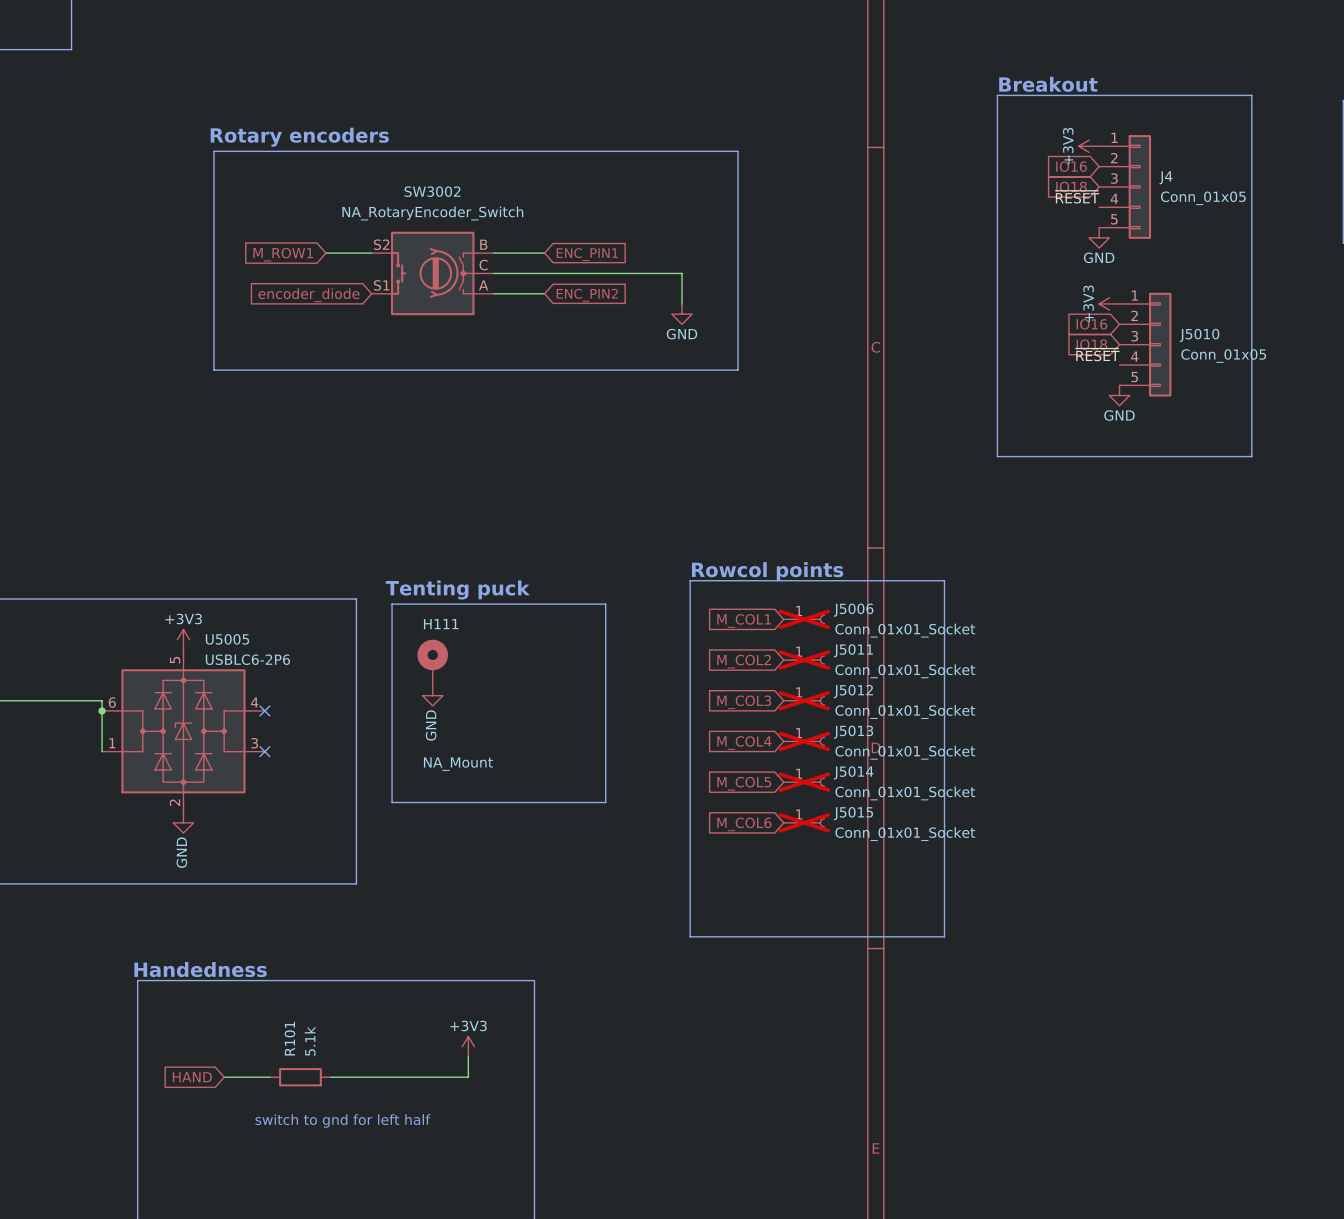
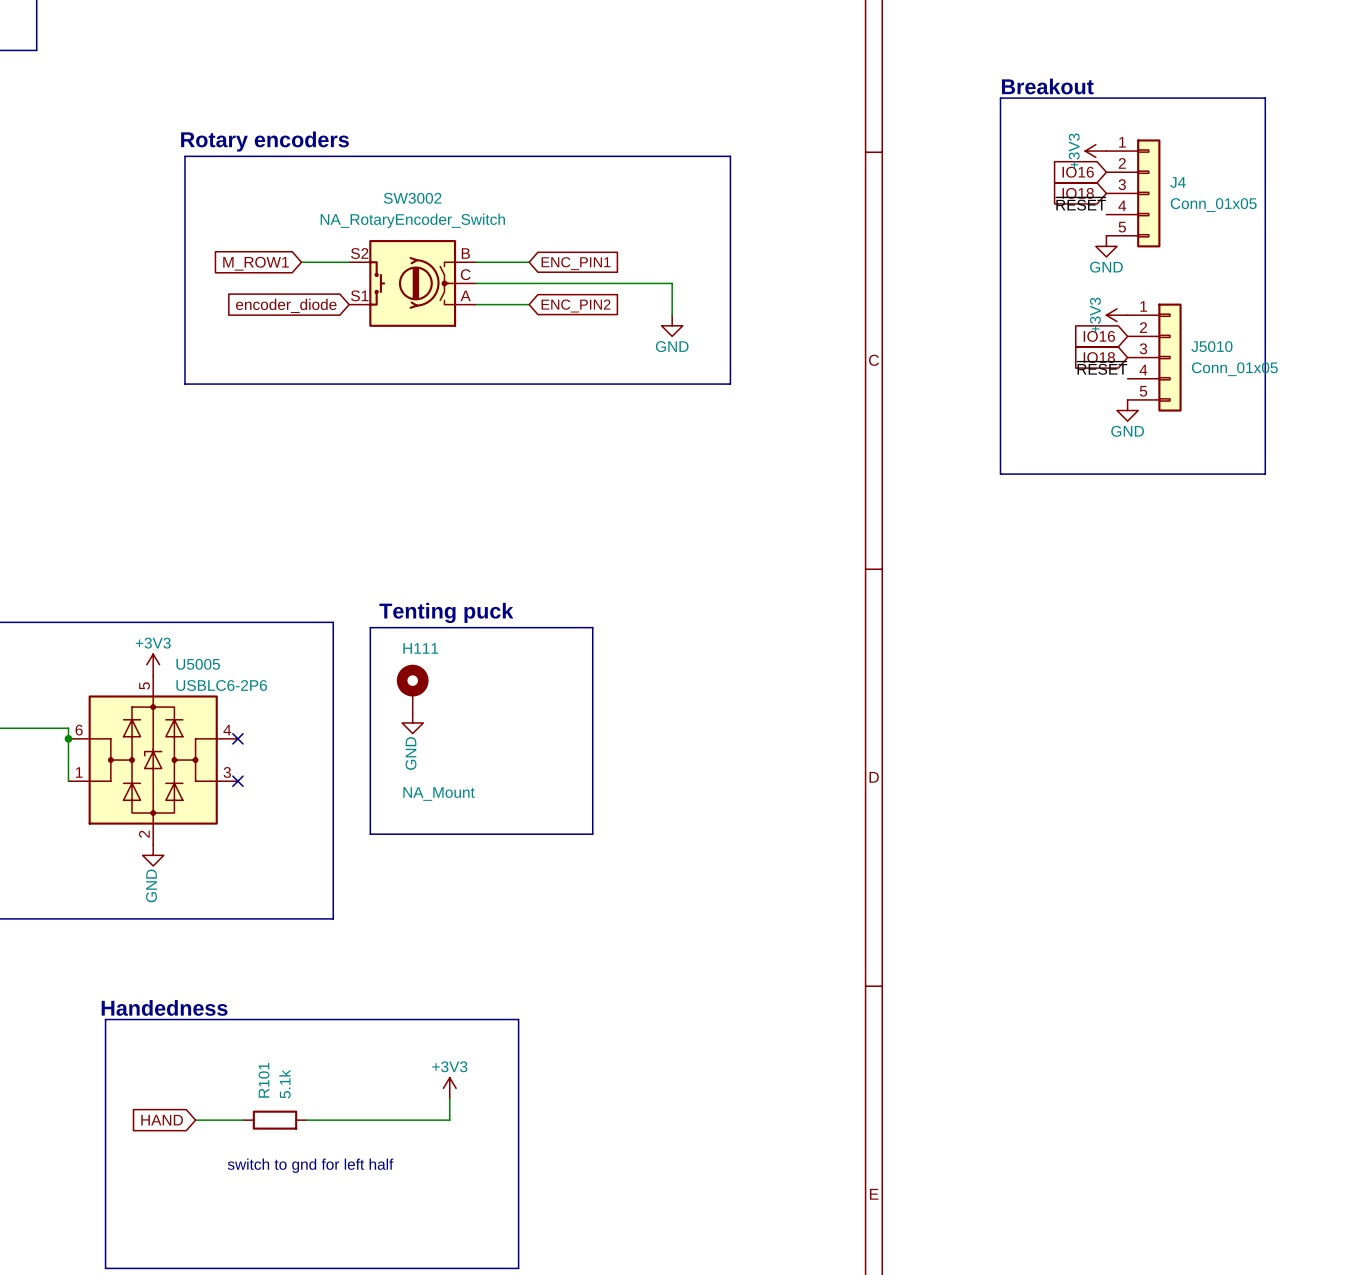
text: Rowcol points (767, 571) -> none
line: (690, 580) (690, 936) (944, 936) (944, 580) (690, 580) -> none
J5006: Conn_01x01_Socket (804, 619) -> none
global label: M_COL1 (744, 620) -> none
J5011: Conn_01x01_Socket (804, 660) -> none
global label: M_COL2 (744, 661) -> none
J5012: Conn_01x01_Socket (804, 700) -> none
global label: M_COL3 (744, 702) -> none
J5013: Conn_01x01_Socket (804, 741) -> none
global label: M_COL4 (744, 743) -> none
J5014: Conn_01x01_Socket (804, 782) -> none
global label: M_COL5 (744, 783) -> none
J5015: Conn_01x01_Socket (804, 822) -> none
global label: M_COL6 (744, 824) -> none

